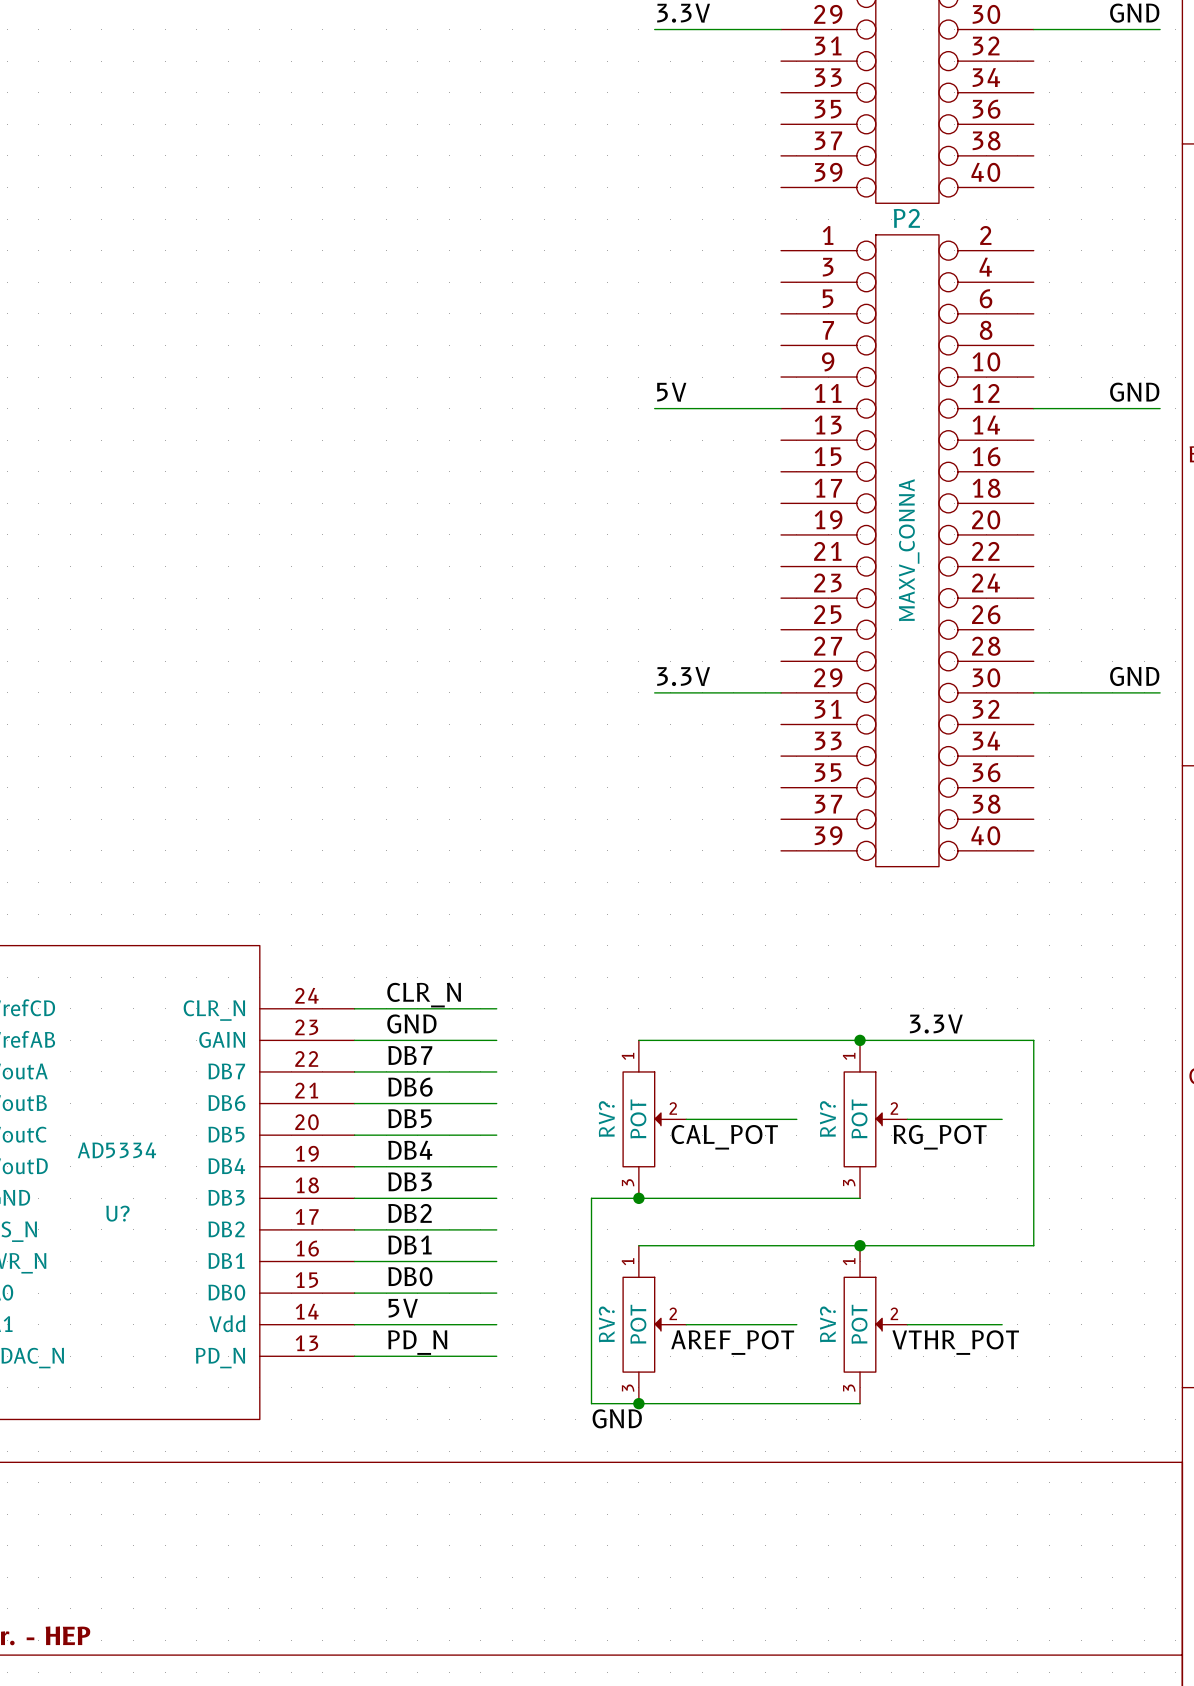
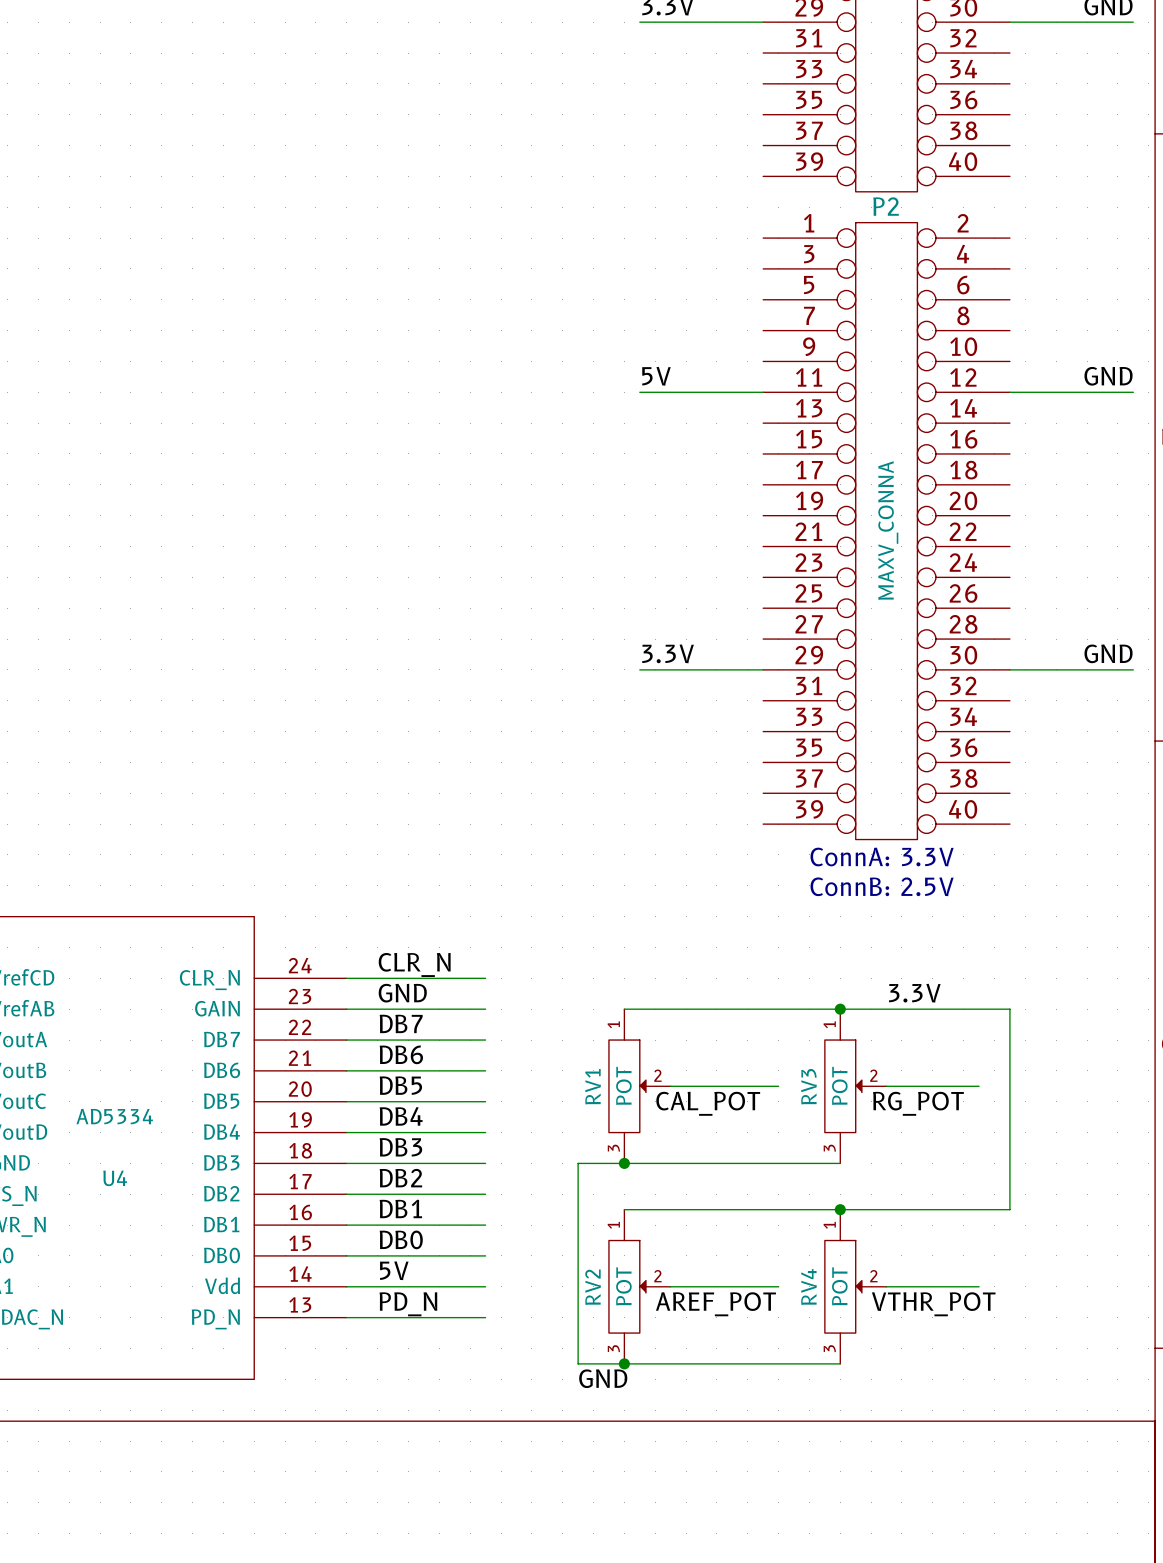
text: none -> ConnA: 3.3V (882, 857)
text: none -> ConnB: 2.5V (882, 886)
RV? name: RV? (606, 1119) -> RV1 (593, 1086)
RV? name: RV? (827, 1119) -> RV3 (808, 1086)
U? name: U? (117, 1213) -> U4 (115, 1178)
RV? name: RV? (606, 1324) -> RV2 (593, 1287)
RV? name: RV? (827, 1324) -> RV4 (808, 1287)

